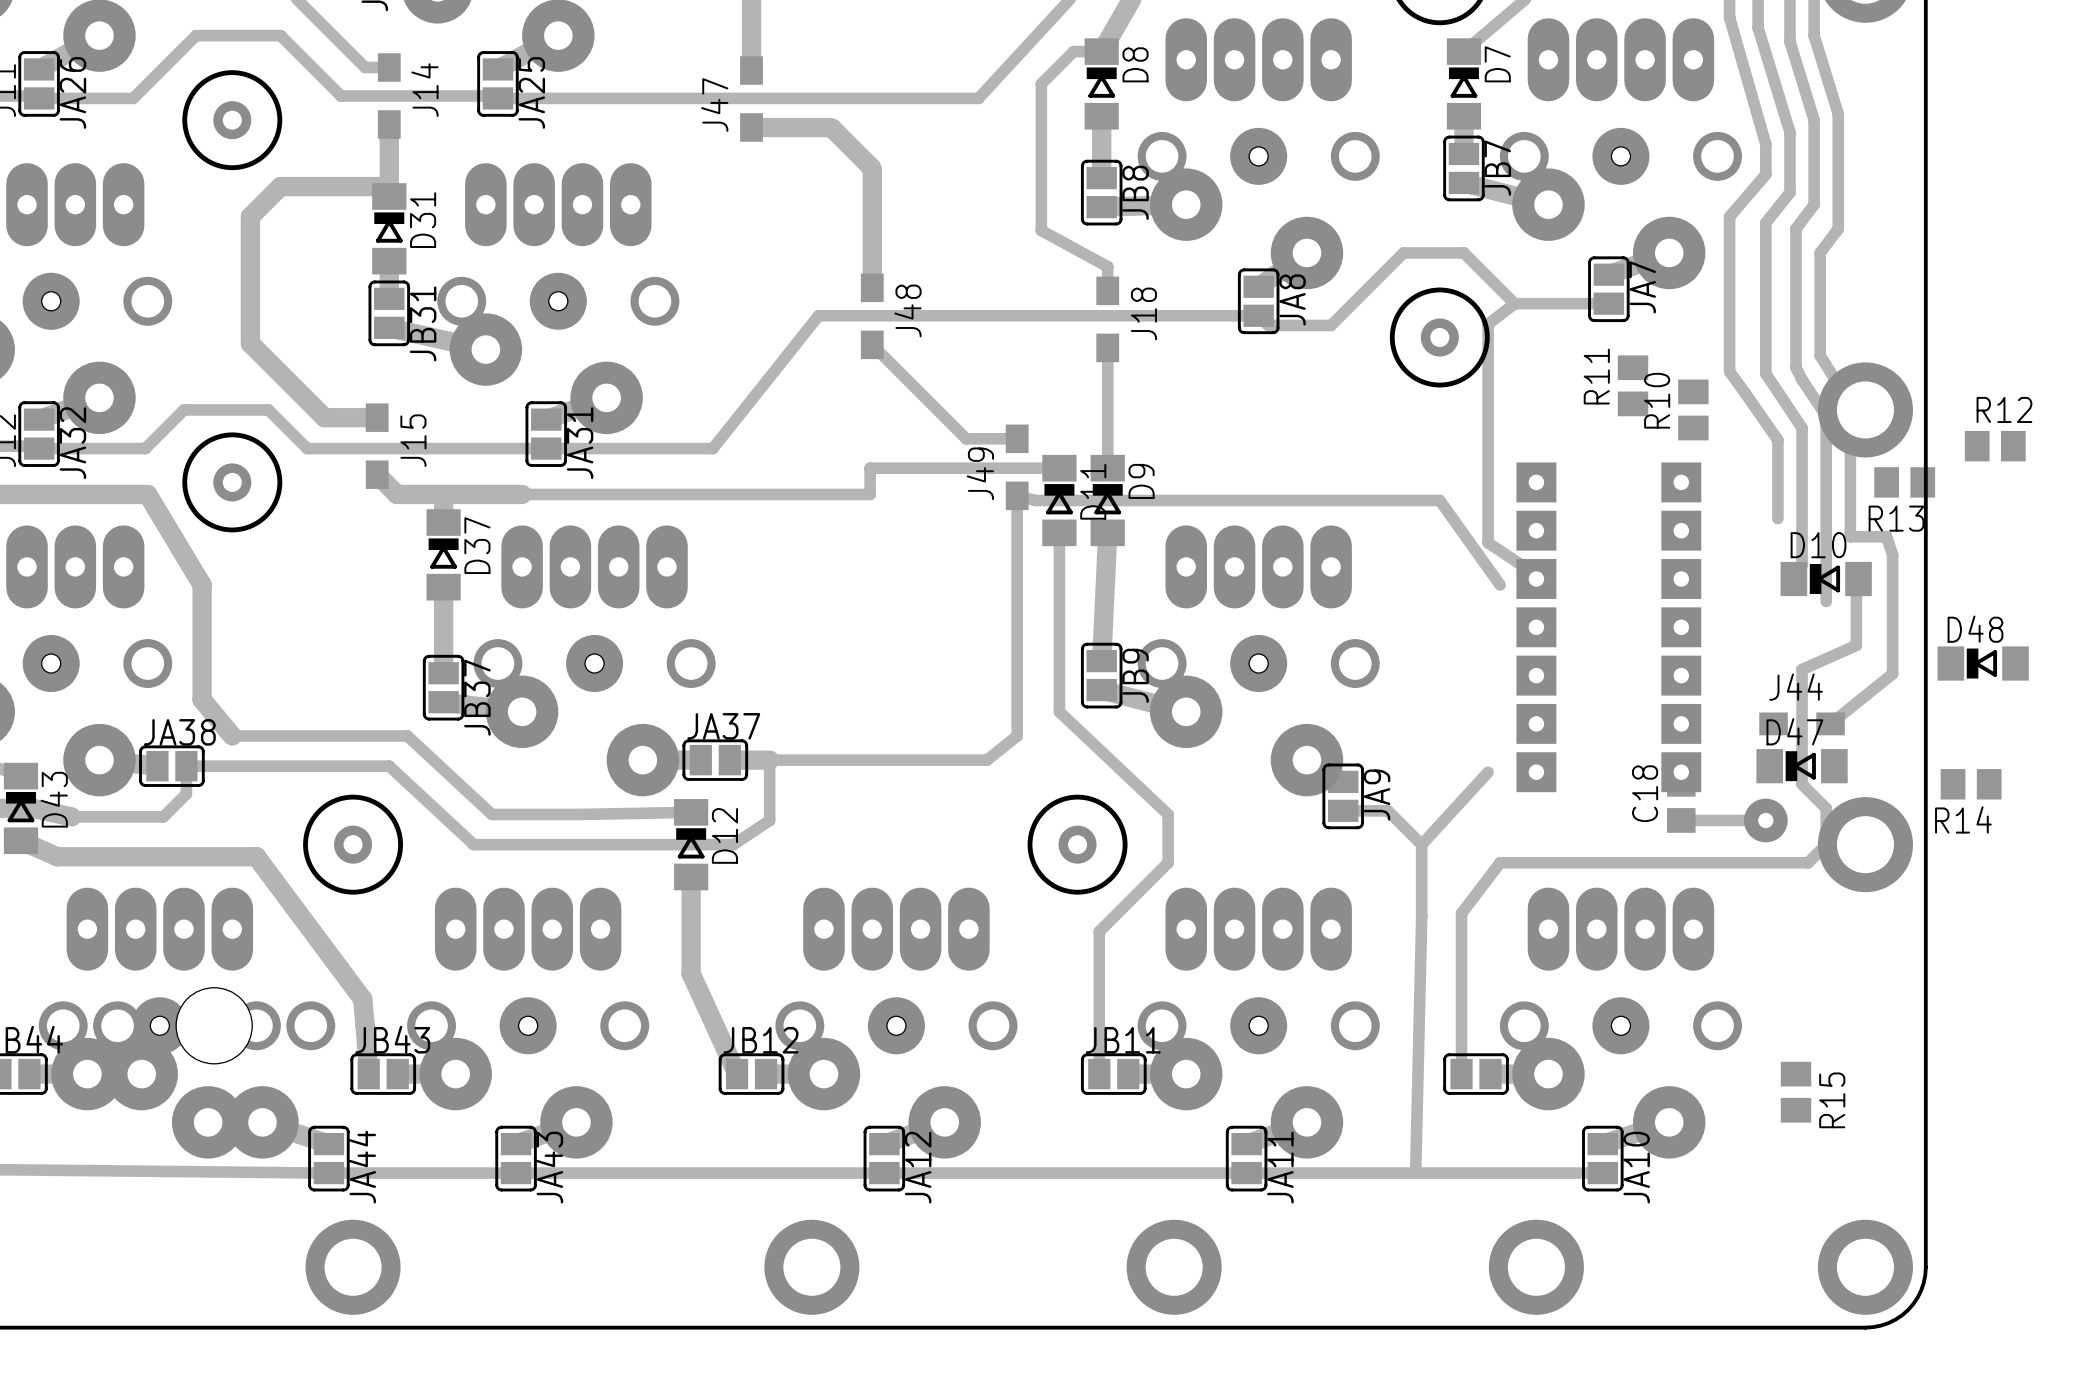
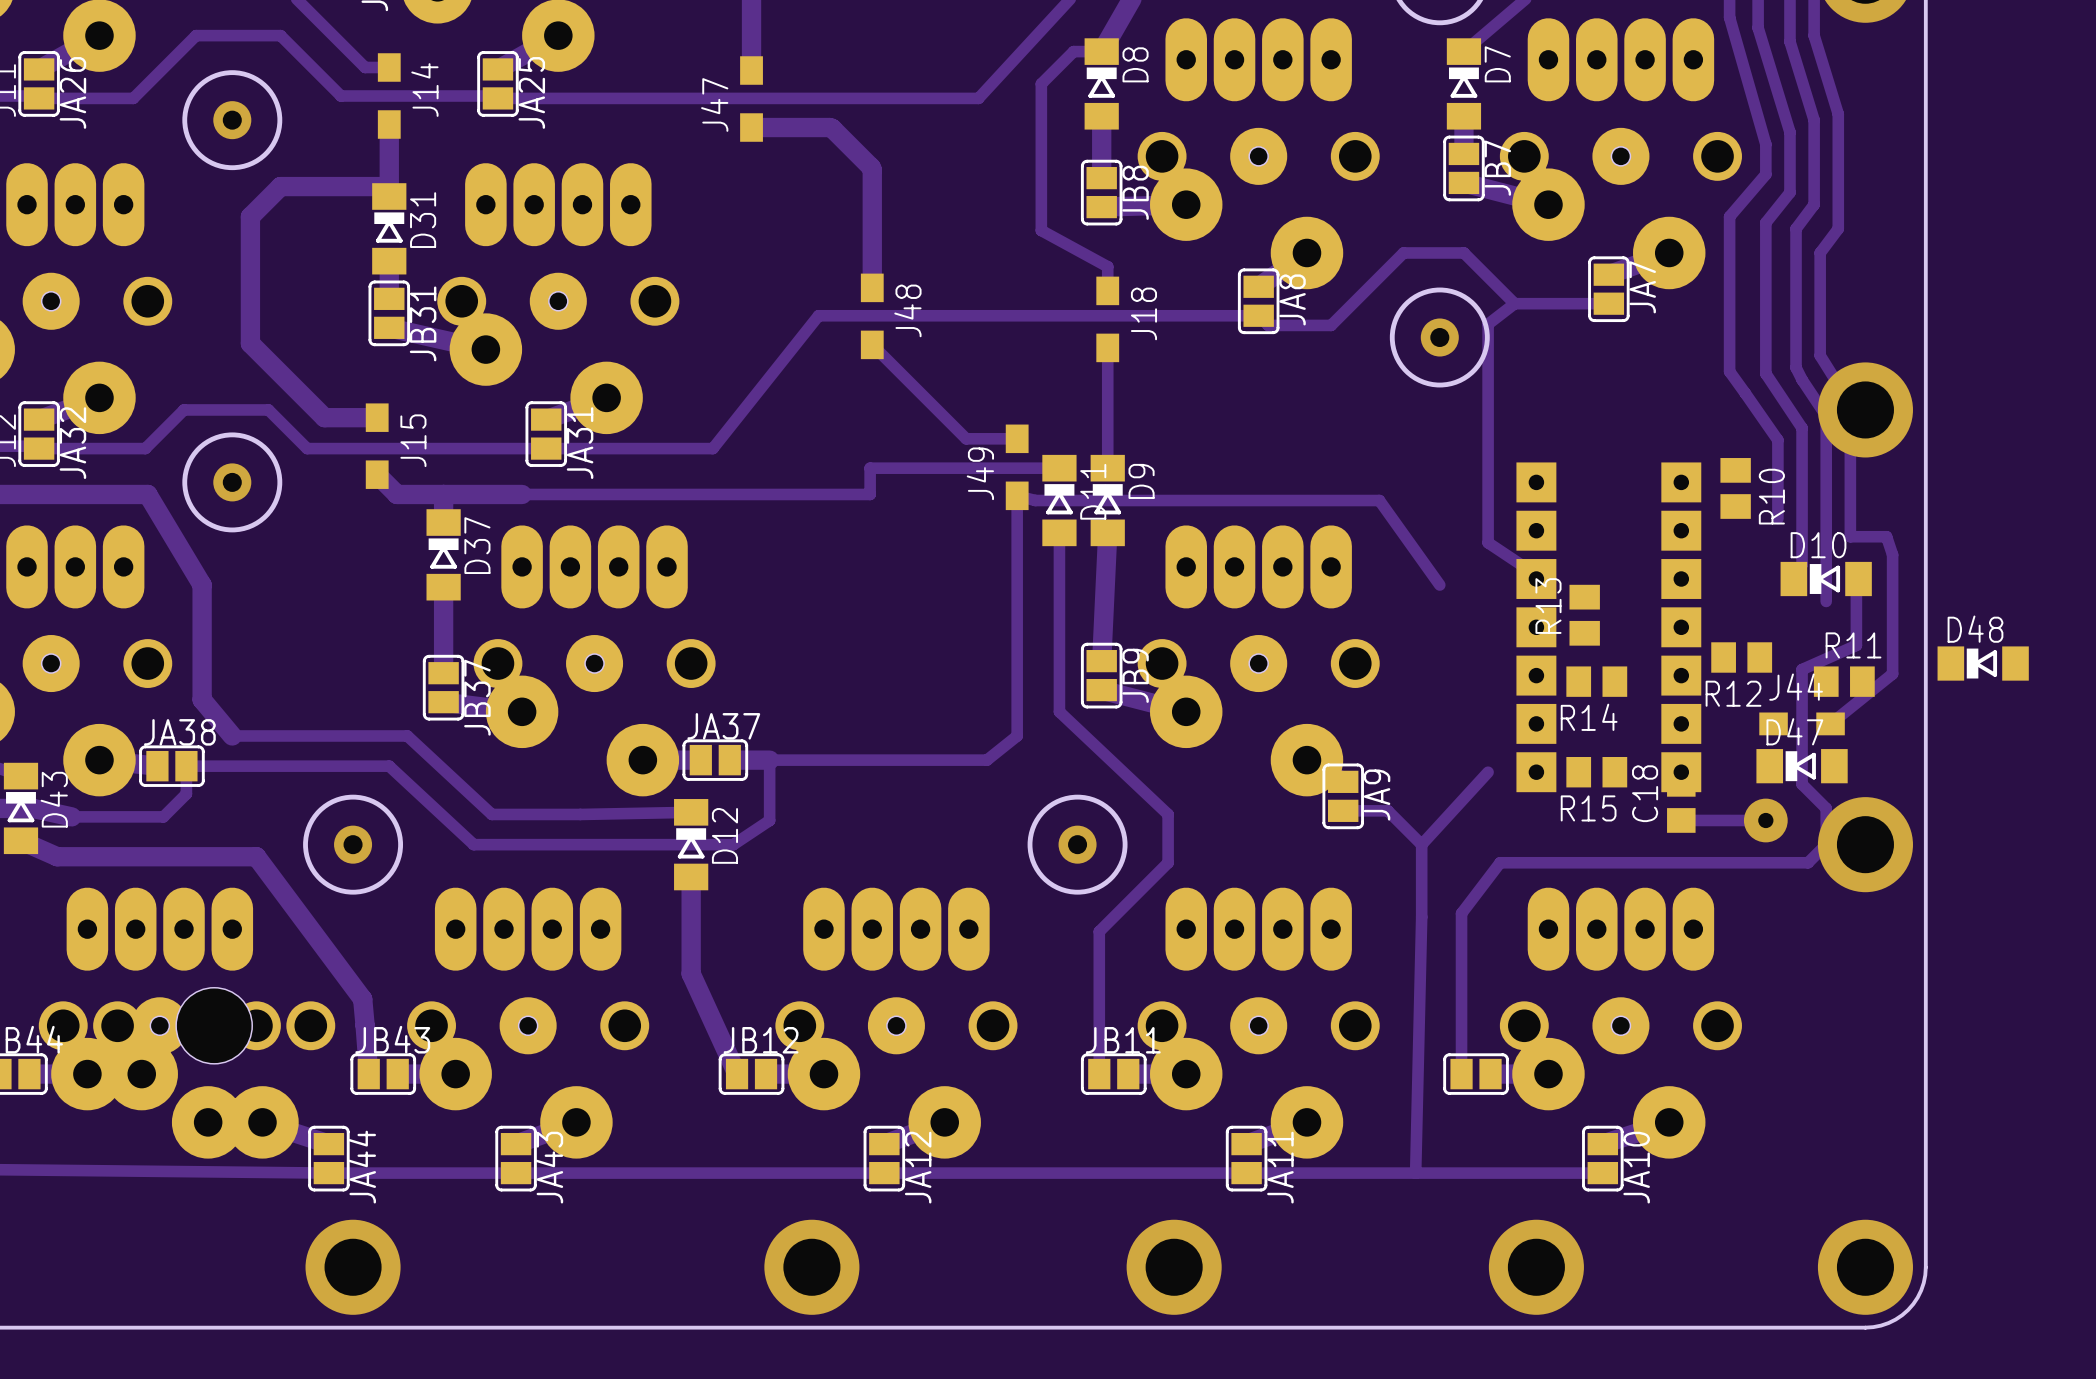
R11 rotation: 0° (1633, 385) -> 90° clockwise (1844, 681)
R11 position: (1633, 385) -> (1844, 681)
R10 name position: R10 (1657, 400) -> R10 (1771, 496)
R10 position: (1693, 409) -> (1735, 488)
R12 name position: R12 (2004, 409) -> R12 (1733, 693)
R12 position: (1995, 446) -> (1741, 657)
R13 rotation: 0° (1904, 482) -> 90° clockwise (1584, 615)
R13 position: (1904, 482) -> (1584, 615)
track: (1379, 500) (1439, 500) (1500, 585) -> (1379, 500) (1439, 585)
R14 position: (1971, 784) -> (1596, 681)
R15 rotation: 0° (1796, 1092) -> 90° clockwise (1596, 772)
R15 position: (1796, 1092) -> (1596, 772)

